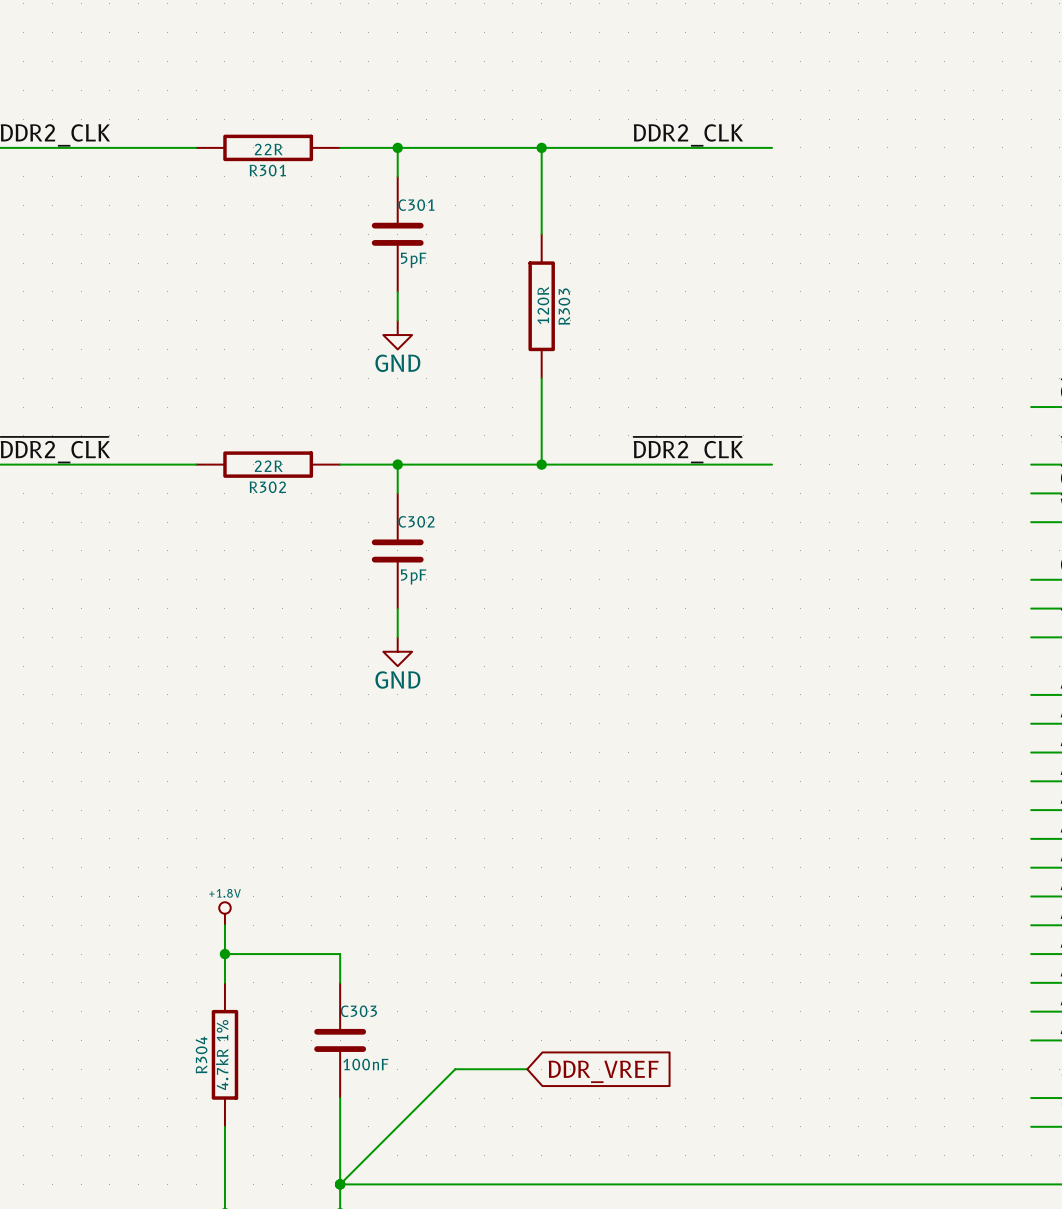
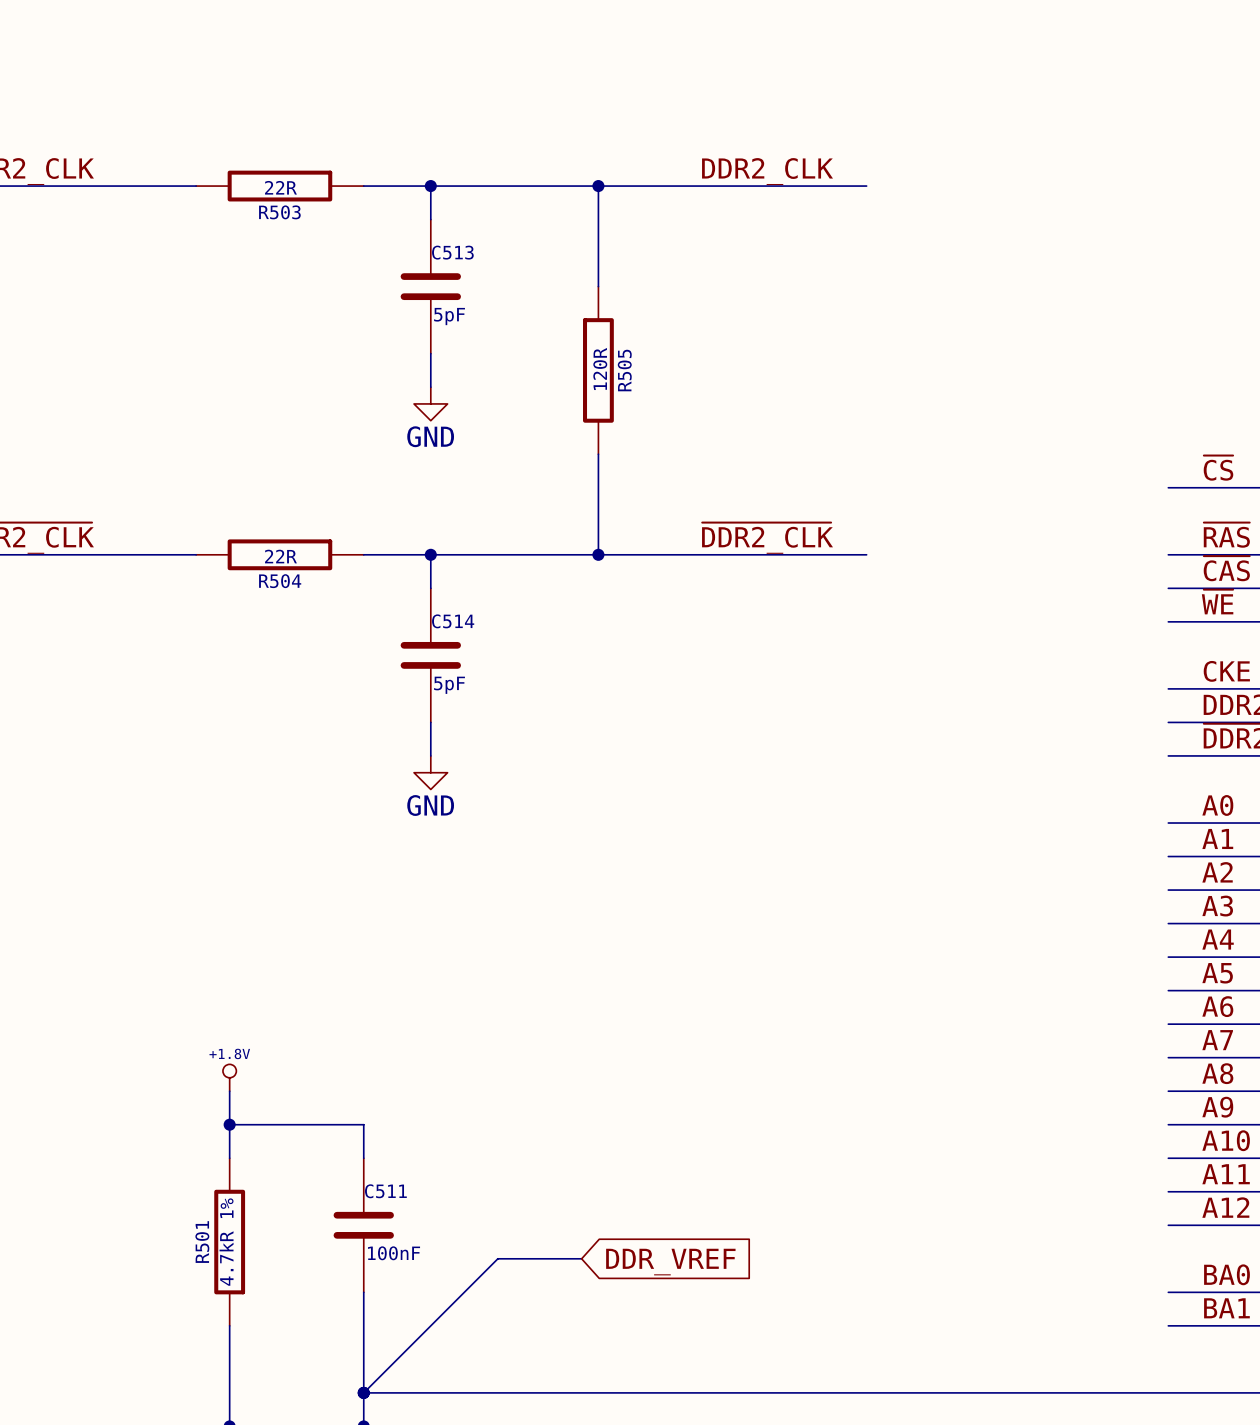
R301 name: R301 (267, 170) -> R503 (279, 212)
C301 name: C301 (416, 205) -> C513 (452, 252)
R303 name: R303 (564, 306) -> R505 (624, 370)
R302 name: R302 (267, 487) -> R504 (280, 581)
C302 name: C302 (416, 521) -> C514 (453, 621)
C303 name: C303 (358, 1011) -> C511 (385, 1191)
R304 name: R304 (201, 1055) -> R501 (202, 1242)

